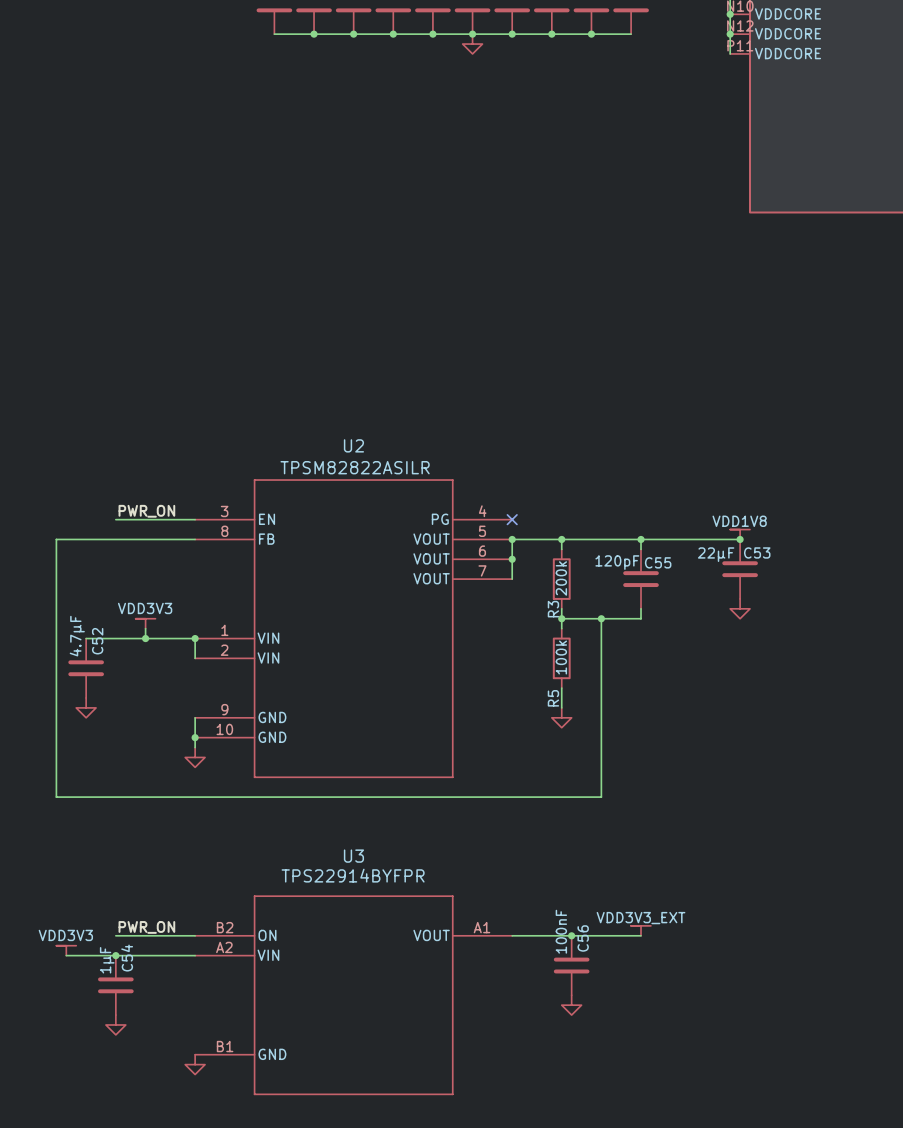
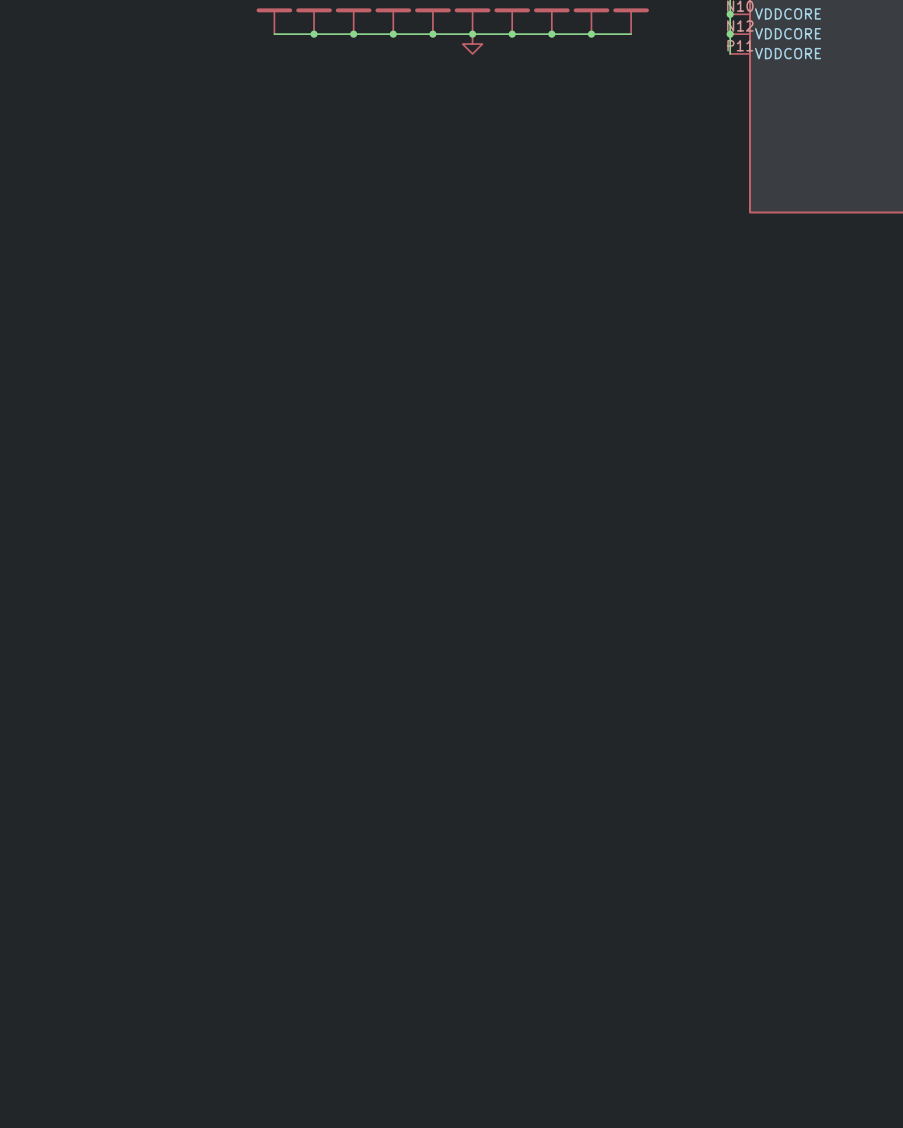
label: PWR_ON (146, 511) -> none
wire: (115, 519) (195, 519) -> none
no-connect mark: (512, 519) -> none
power symbol: VDD1V8 (740, 534) -> none
wire: (195, 539) (56, 539) (56, 797) (601, 797) (601, 618) -> none
junction: (512, 539) -> none
wire: (561, 539) (561, 549) -> none
junction: (561, 539) -> none
wire: (641, 539) (641, 549) -> none
junction: (641, 539) -> none
wire: (740, 539) (512, 539) (512, 579) -> none
junction: (740, 539) -> none
junction: (512, 559) -> none
C53: 22µF (740, 569) -> none
R3: 200k (561, 579) -> none
C55: 120pF (641, 579) -> none
wire: (561, 608) (561, 628) -> none
wire: (641, 608) (641, 618) (561, 618) -> none
power symbol: (740, 608) -> none
junction: (561, 618) -> none
junction: (601, 618) -> none
power symbol: VDD3V3 (145, 623) -> none
wire: (145, 628) (145, 638) -> none
U2: TPSM82822ASILR (353, 628) -> none
wire: (86, 638) (195, 638) (195, 658) -> none
junction: (145, 638) -> none
junction: (195, 638) -> none
R5: 100k (561, 658) -> none
C52: 4.7µF (86, 668) -> none
wire: (561, 688) (561, 707) -> none
power symbol: (86, 707) -> none
wire: (195, 717) (195, 747) -> none
power symbol: (561, 717) -> none
junction: (195, 737) -> none
power symbol: (195, 757) -> none
label: PWR_ON (146, 927) -> none
power symbol: VDD3V3_EXT (641, 930) -> none
wire: (115, 935) (195, 935) -> none
wire: (512, 935) (641, 935) -> none
junction: (571, 935) -> none
power symbol: VDD3V3 (66, 950) -> none
wire: (66, 955) (195, 955) -> none
junction: (115, 955) -> none
C56: 100nF (571, 965) -> none
C54: 1µF (115, 985) -> none
U3: TPS22914BYFPR (353, 995) -> none
power symbol: (571, 1005) -> none
power symbol: (115, 1024) -> none
power symbol: (195, 1064) -> none

